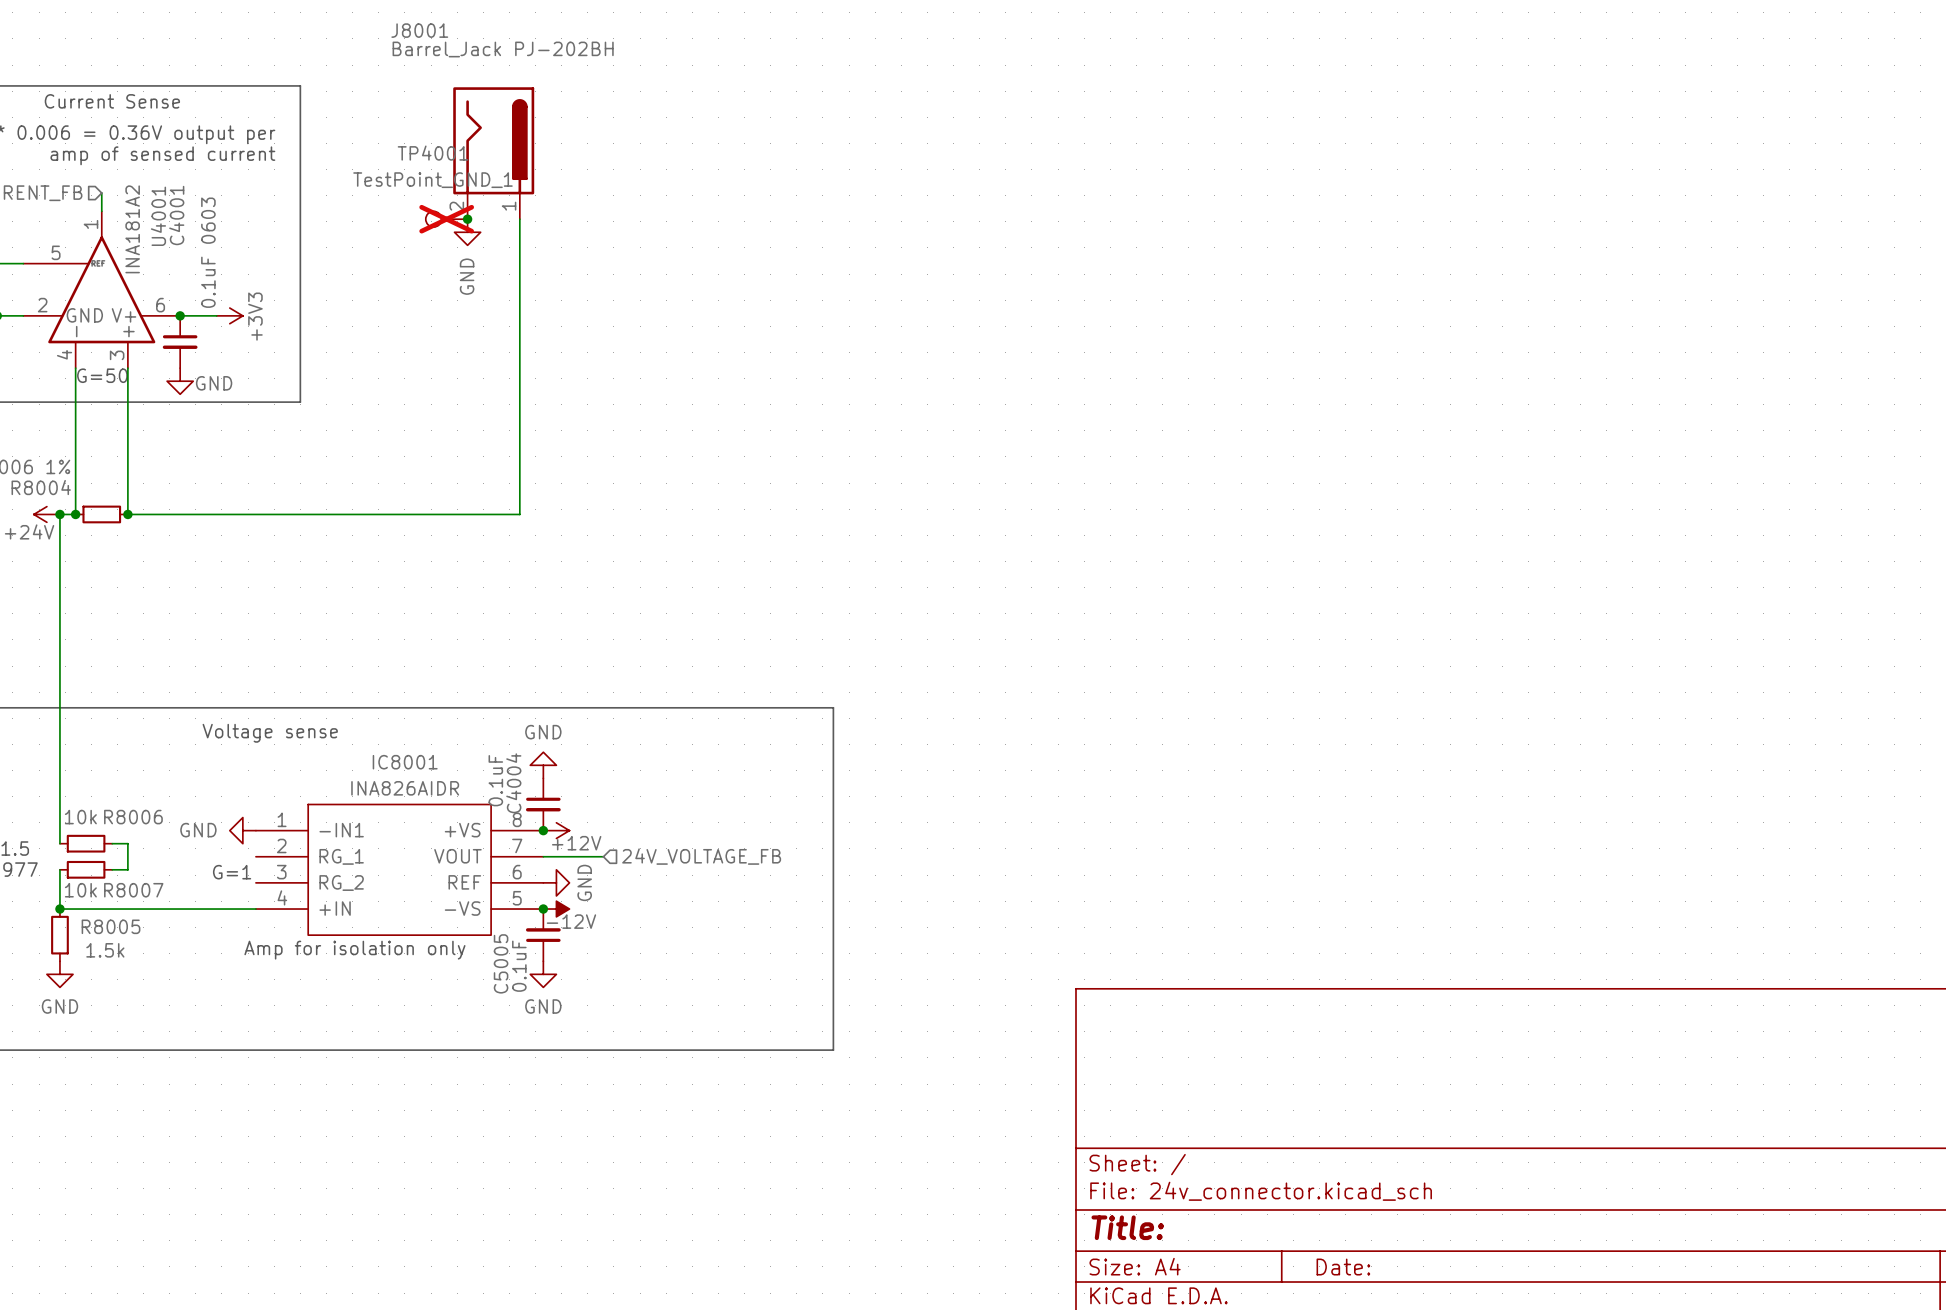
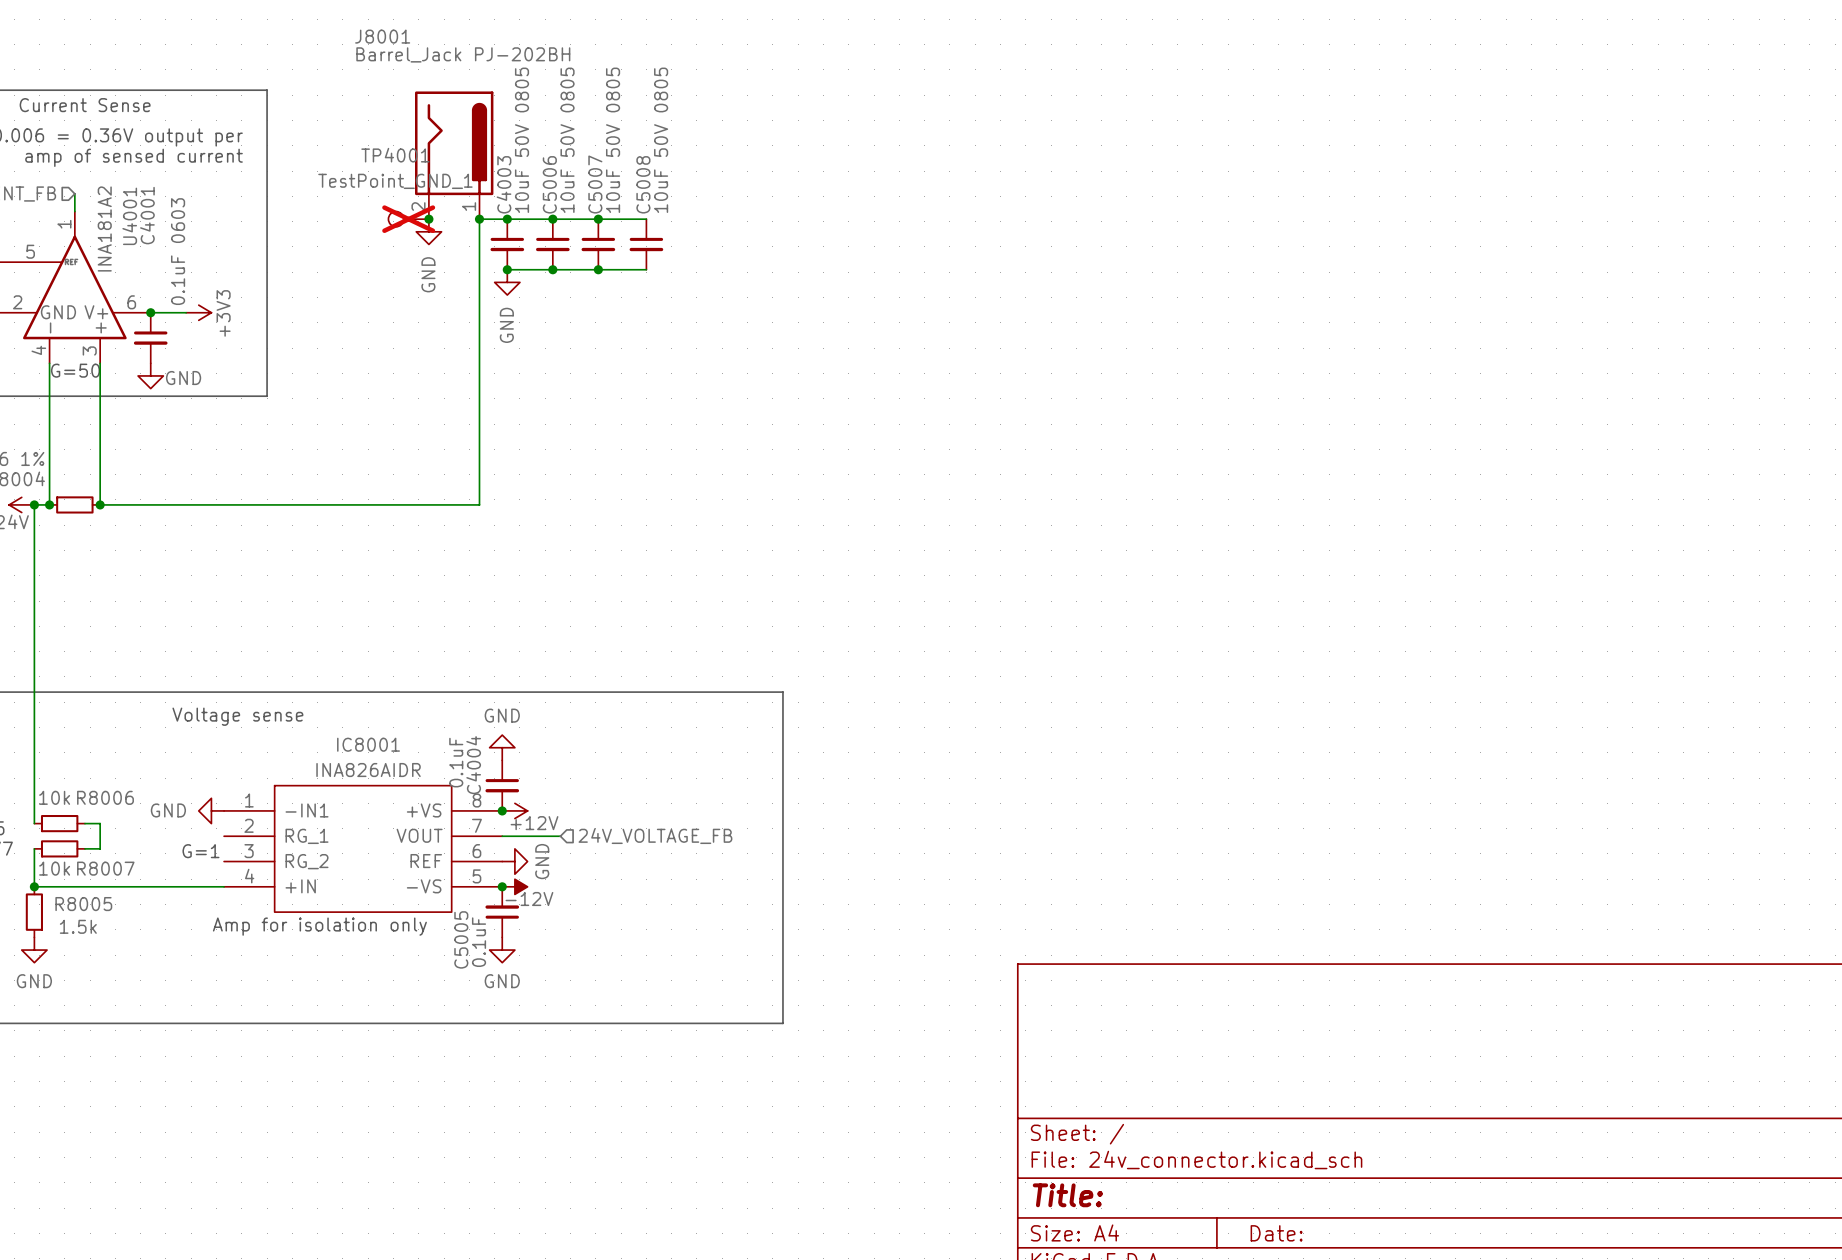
wire: none -> (479, 219) (646, 219)
junction: none -> (479, 219)
junction: none -> (507, 219)
junction: none -> (552, 219)
junction: none -> (598, 219)
C4003: none -> 10uF 50V 0805 (507, 244)
C5006: none -> 10uF 50V 0805 (552, 244)
C5007: none -> 10uF 50V 0805 (598, 244)
C5008: none -> 10uF 50V 0805 (646, 244)
wire: none -> (507, 269) (646, 269)
junction: none -> (507, 269)
junction: none -> (552, 269)
junction: none -> (598, 269)
power symbol: none -> GND (507, 282)

